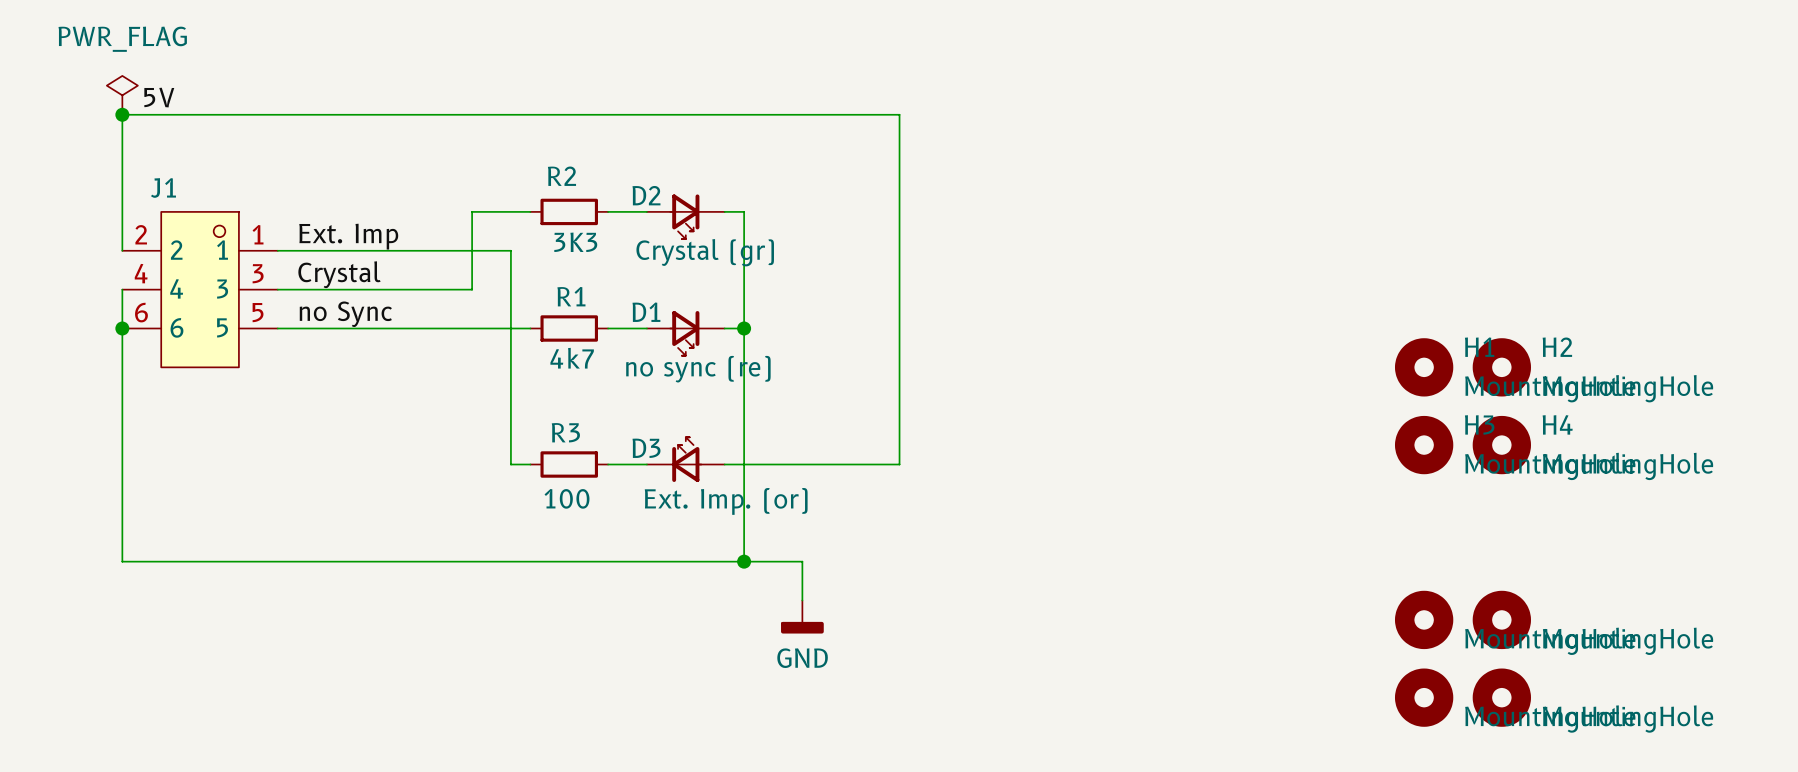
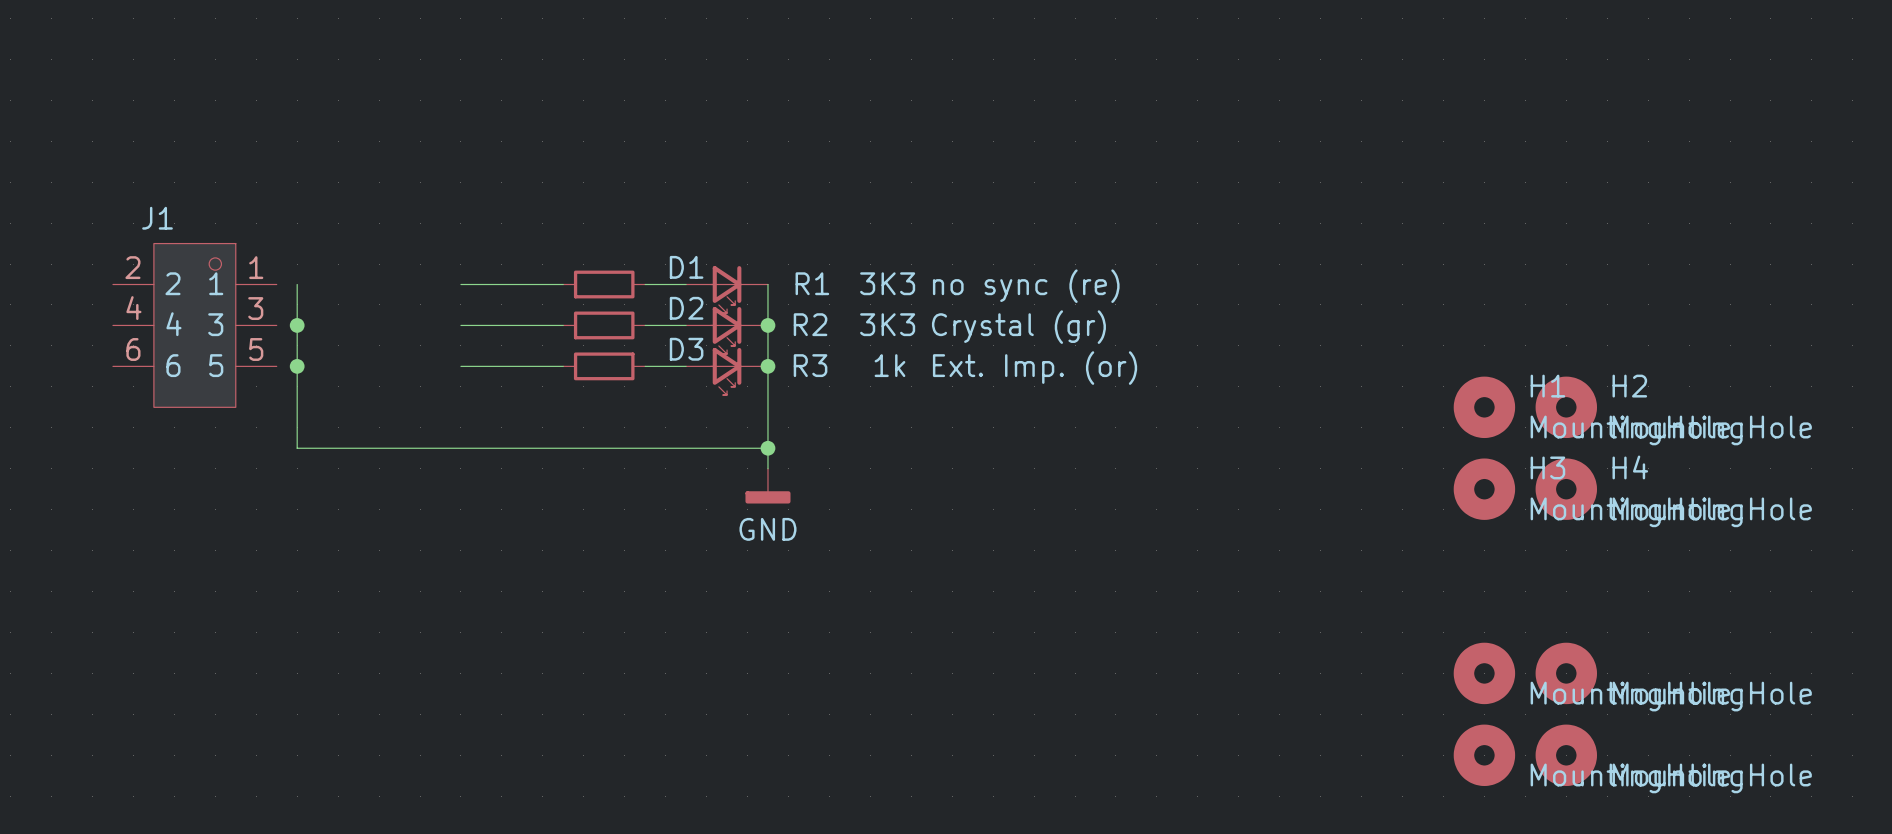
power symbol: PWR_FLAG (122, 95) -> none
label: 5V (159, 97) -> none
junction: (122, 114) -> none
R2 name position: R2 (561, 176) -> R2 (810, 324)
wire: (530, 211) (472, 211) (472, 289) -> (563, 325) (481, 325)
R2 position: (569, 211) -> (604, 325)
wire: (608, 211) (646, 211) -> (645, 284) (686, 284)
wire: (724, 211) (744, 211) (744, 250) -> none
D2 position: (685, 216) -> (727, 330)
label: Ext. Imp (348, 236) -> none
R2 value position: 3K3 (575, 242) -> 3K3 (887, 324)
wire: (122, 250) (122, 114) (899, 114) (899, 464) (724, 464) -> none
wire: (277, 250) (452, 250) -> none
wire: none -> (297, 284) (297, 448) (767, 448)
wire: (510, 250) (510, 464) (530, 464) -> (522, 284) (563, 284)
D2 value position: Crystal (gr) (705, 252) -> Crystal (gr) (1018, 327)
label: Crystal (339, 274) -> none
wire: (122, 289) (122, 561) (802, 561) (802, 600) -> none
wire: (277, 289) (452, 289) -> none
junction: none -> (297, 325)
junction: none -> (767, 325)
R1 name position: R1 (571, 296) -> R1 (812, 283)
label: no Sync (345, 314) -> none
junction: (122, 328) -> none
wire: (277, 328) (452, 328) -> none
junction: none -> (297, 366)
R1 position: (569, 328) -> (604, 284)
D1 position: (685, 333) -> (727, 289)
R1 value: 4k7 (572, 358) -> 3K3 (887, 283)
D1 value position: no sync (re) (698, 369) -> no sync (re) (1026, 286)
junction: none -> (767, 448)
wire: (744, 425) (744, 561) -> none
R3 name position: R3 (565, 432) -> R3 (810, 365)
D3 position: (685, 459) -> (727, 371)
D3 rotation: 0° (686, 459) -> 180° (726, 371)
R3 position: (569, 464) -> (604, 366)
wire: (608, 464) (646, 464) -> (645, 325) (686, 325)
R3 value: 100 (567, 498) -> 1k (889, 365)
D3 value position: Ext. Imp. (or) (726, 501) -> Ext. Imp. (or) (1035, 368)
junction: (744, 561) -> none
power symbol position: GND (802, 617) -> GND (767, 486)

